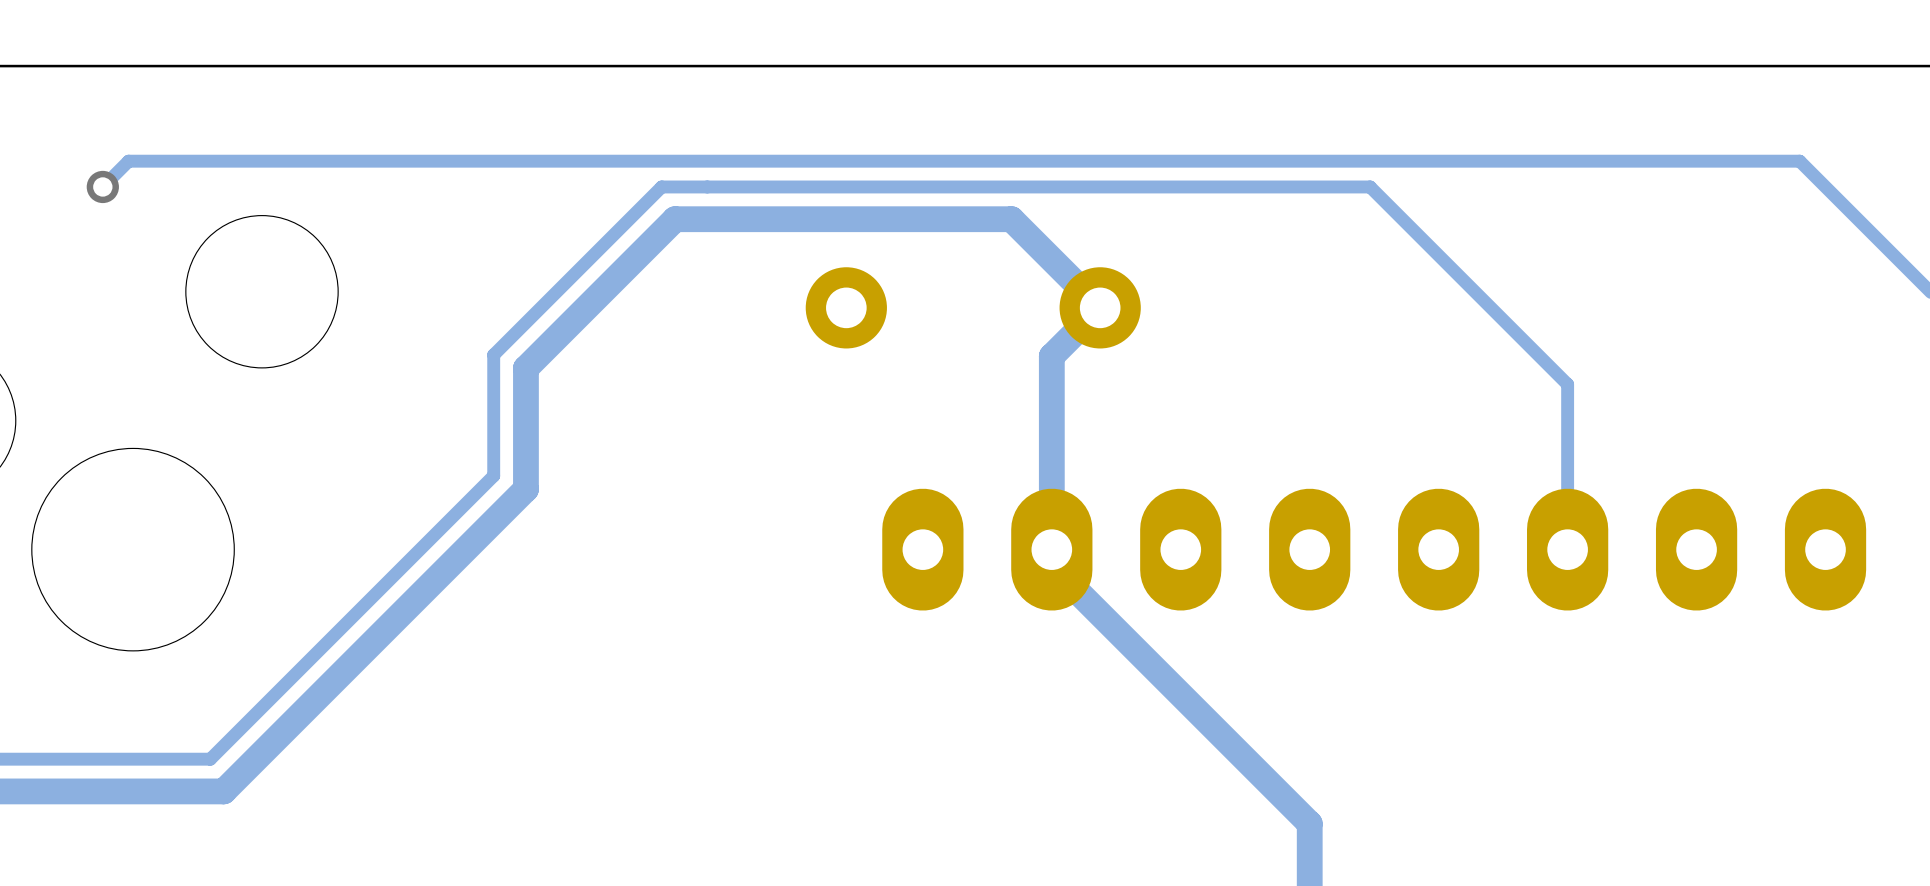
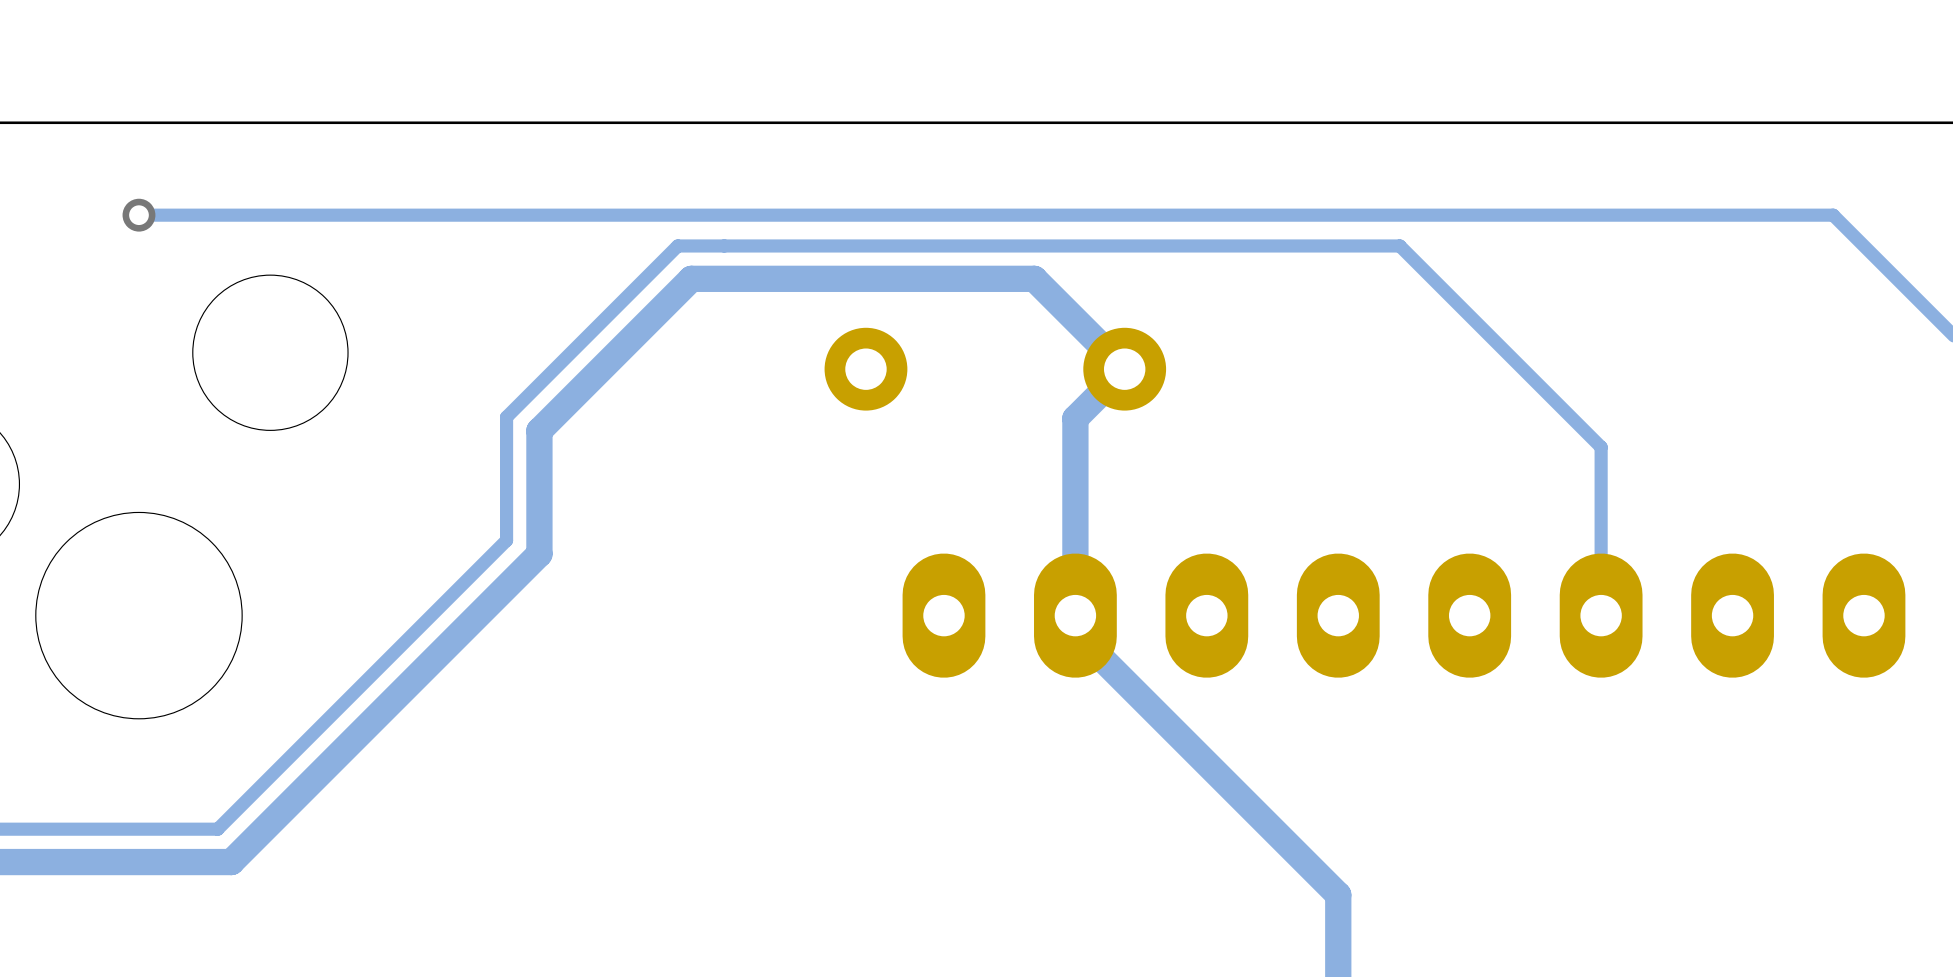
track: (1799, 161) (128, 161) (102, 186) -> (1837, 219) (1833, 215) (138, 215)
via position: (102, 186) -> (138, 215)

